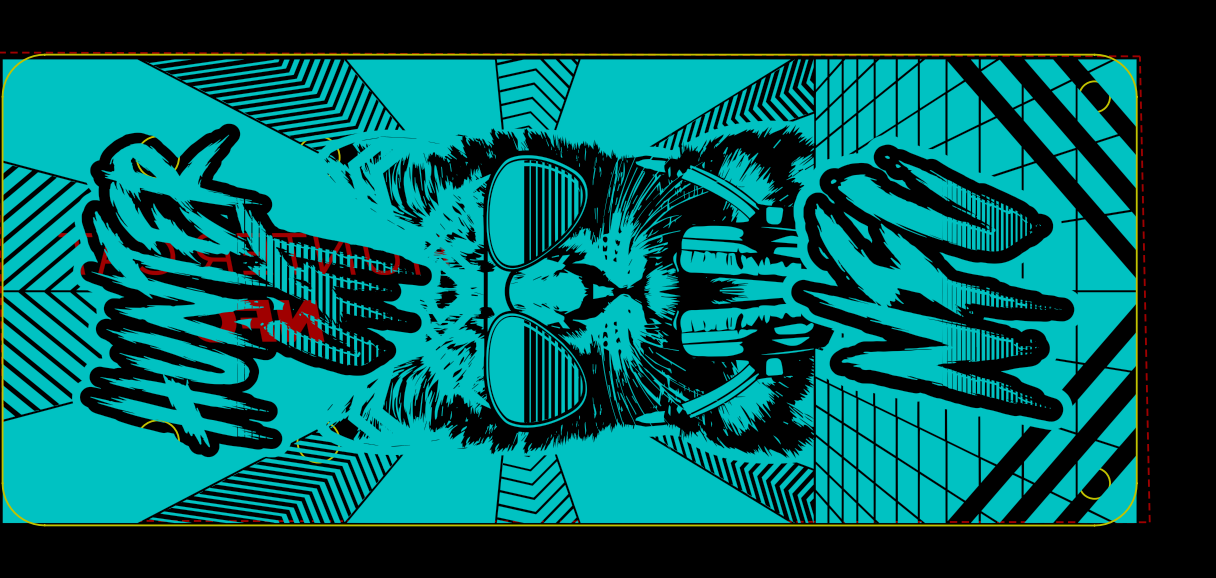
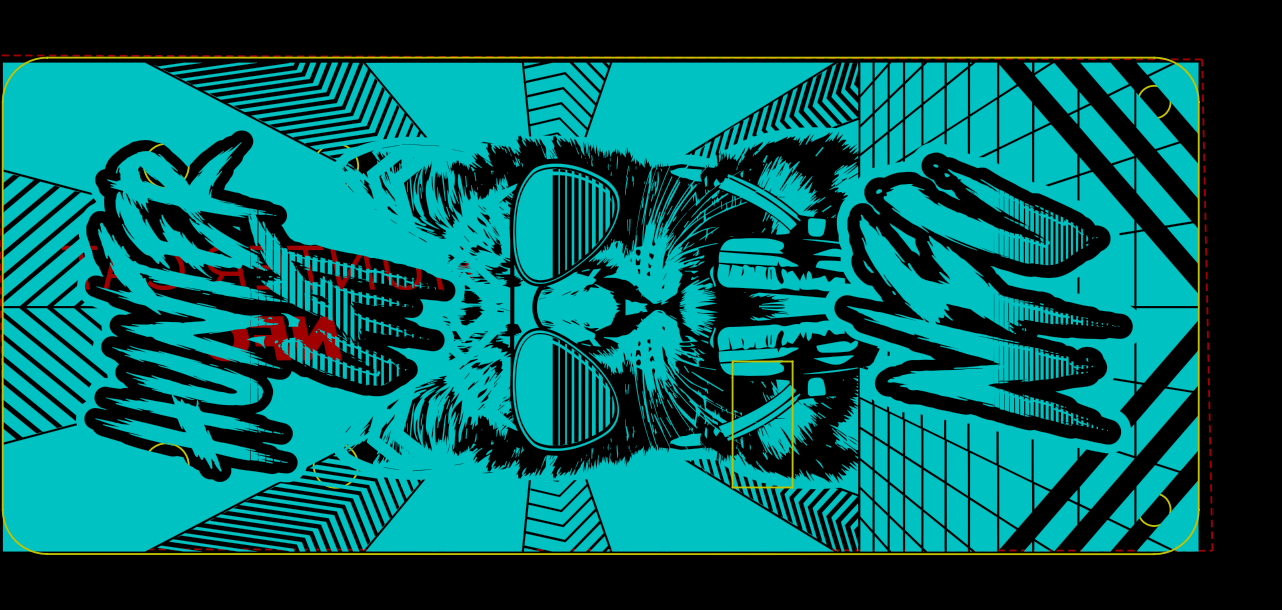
board edge: none -> (792, 361) (792, 487) (732, 487) (732, 361) (792, 361)

